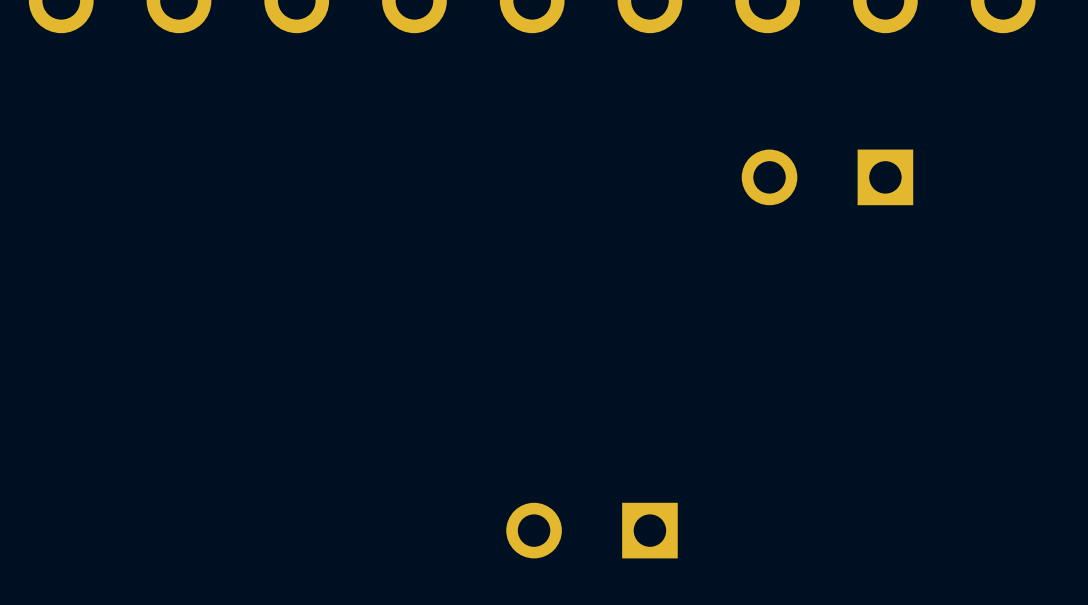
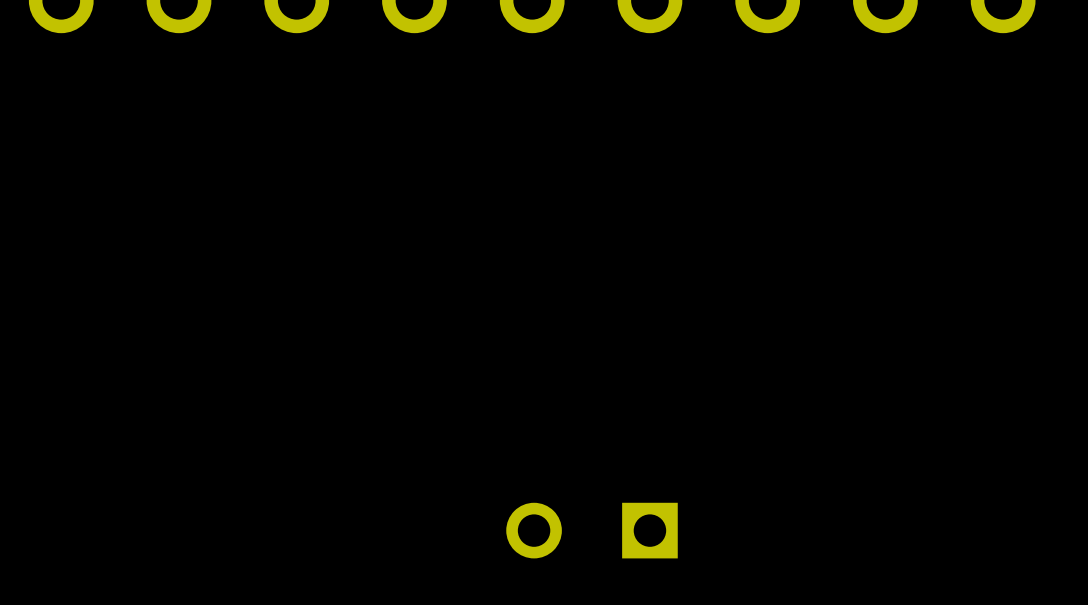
part: (827, 177) -> none

